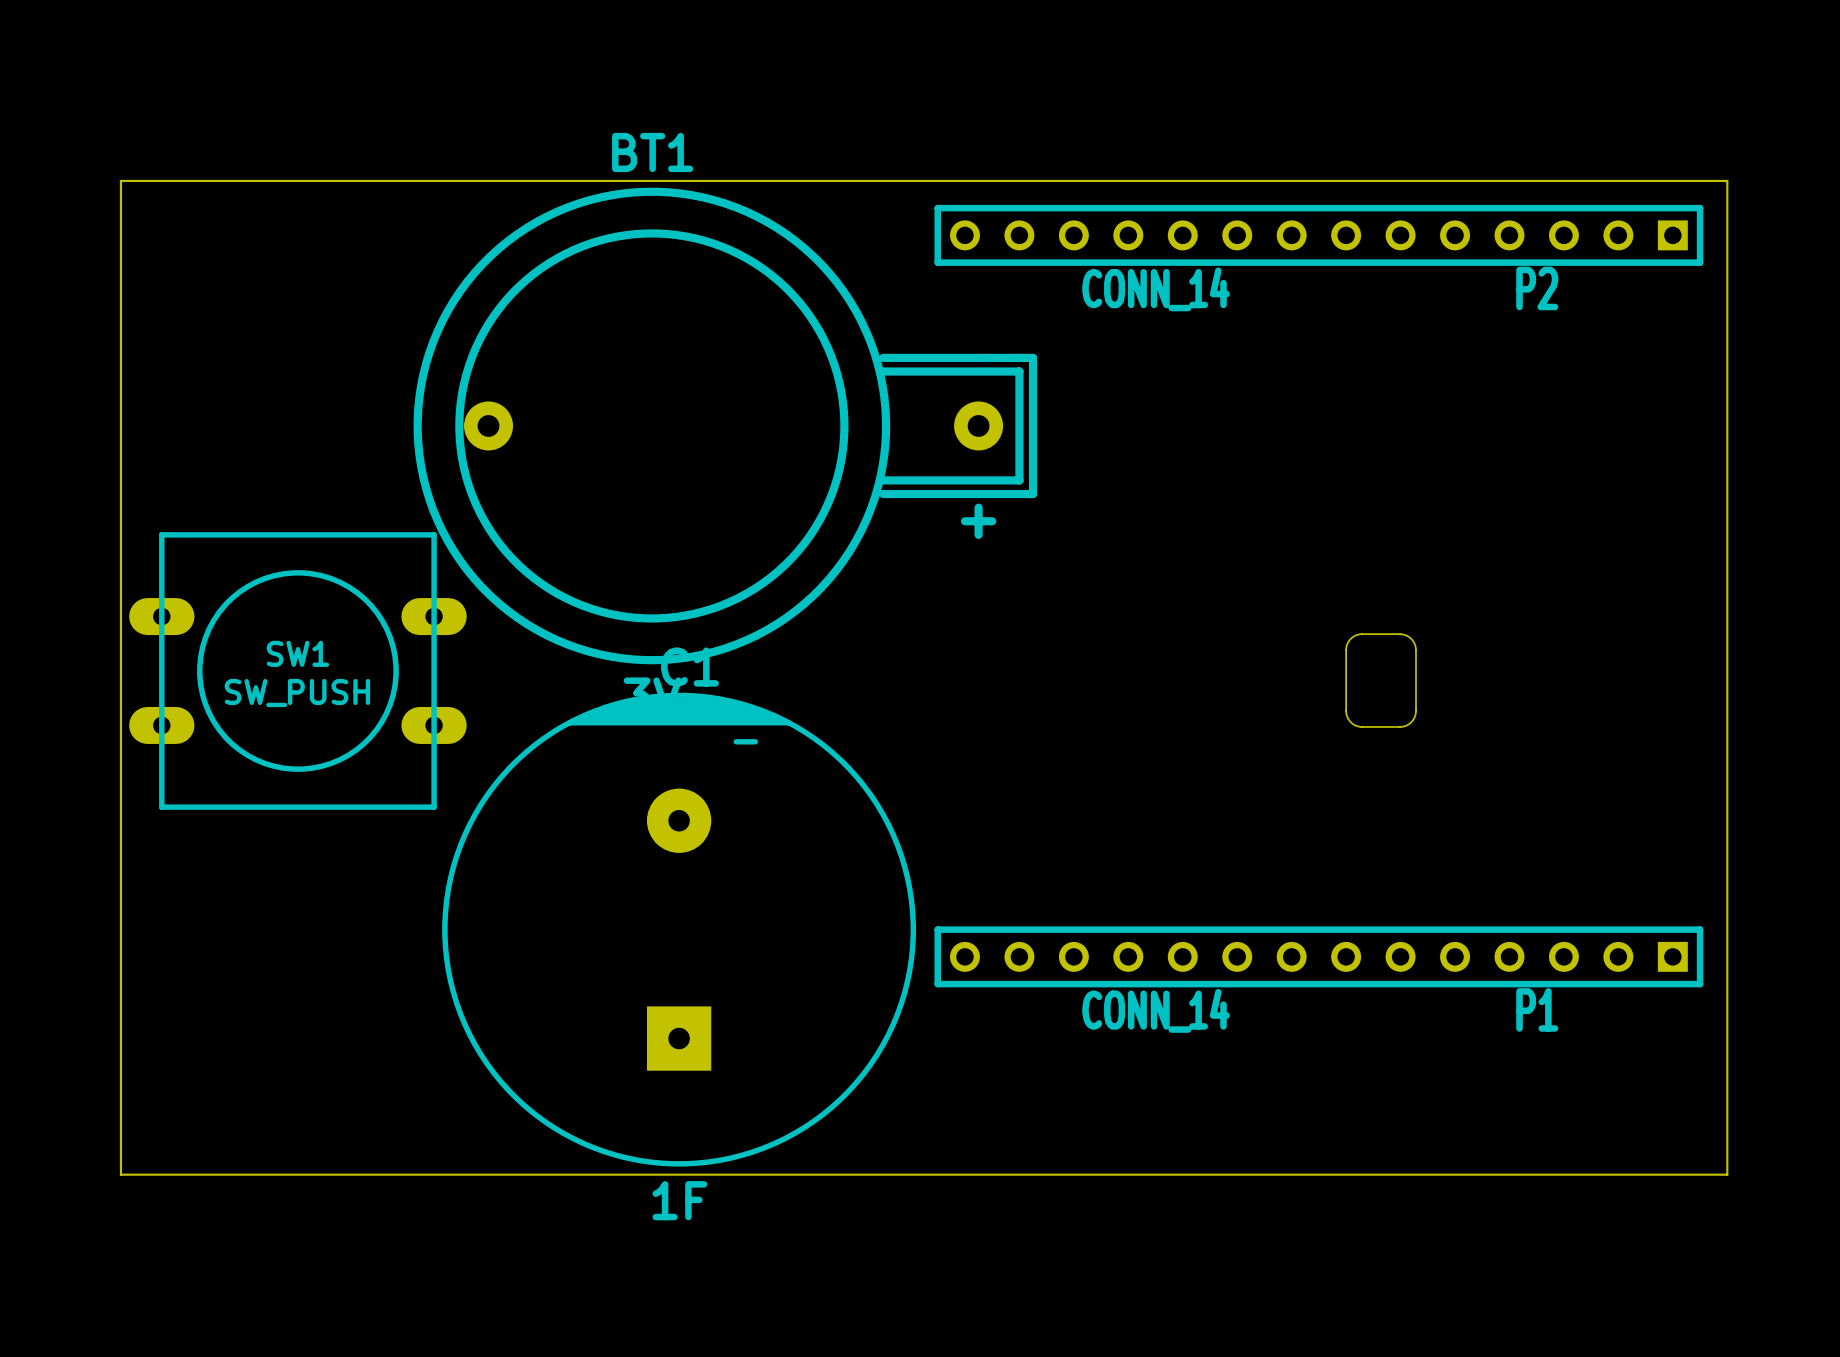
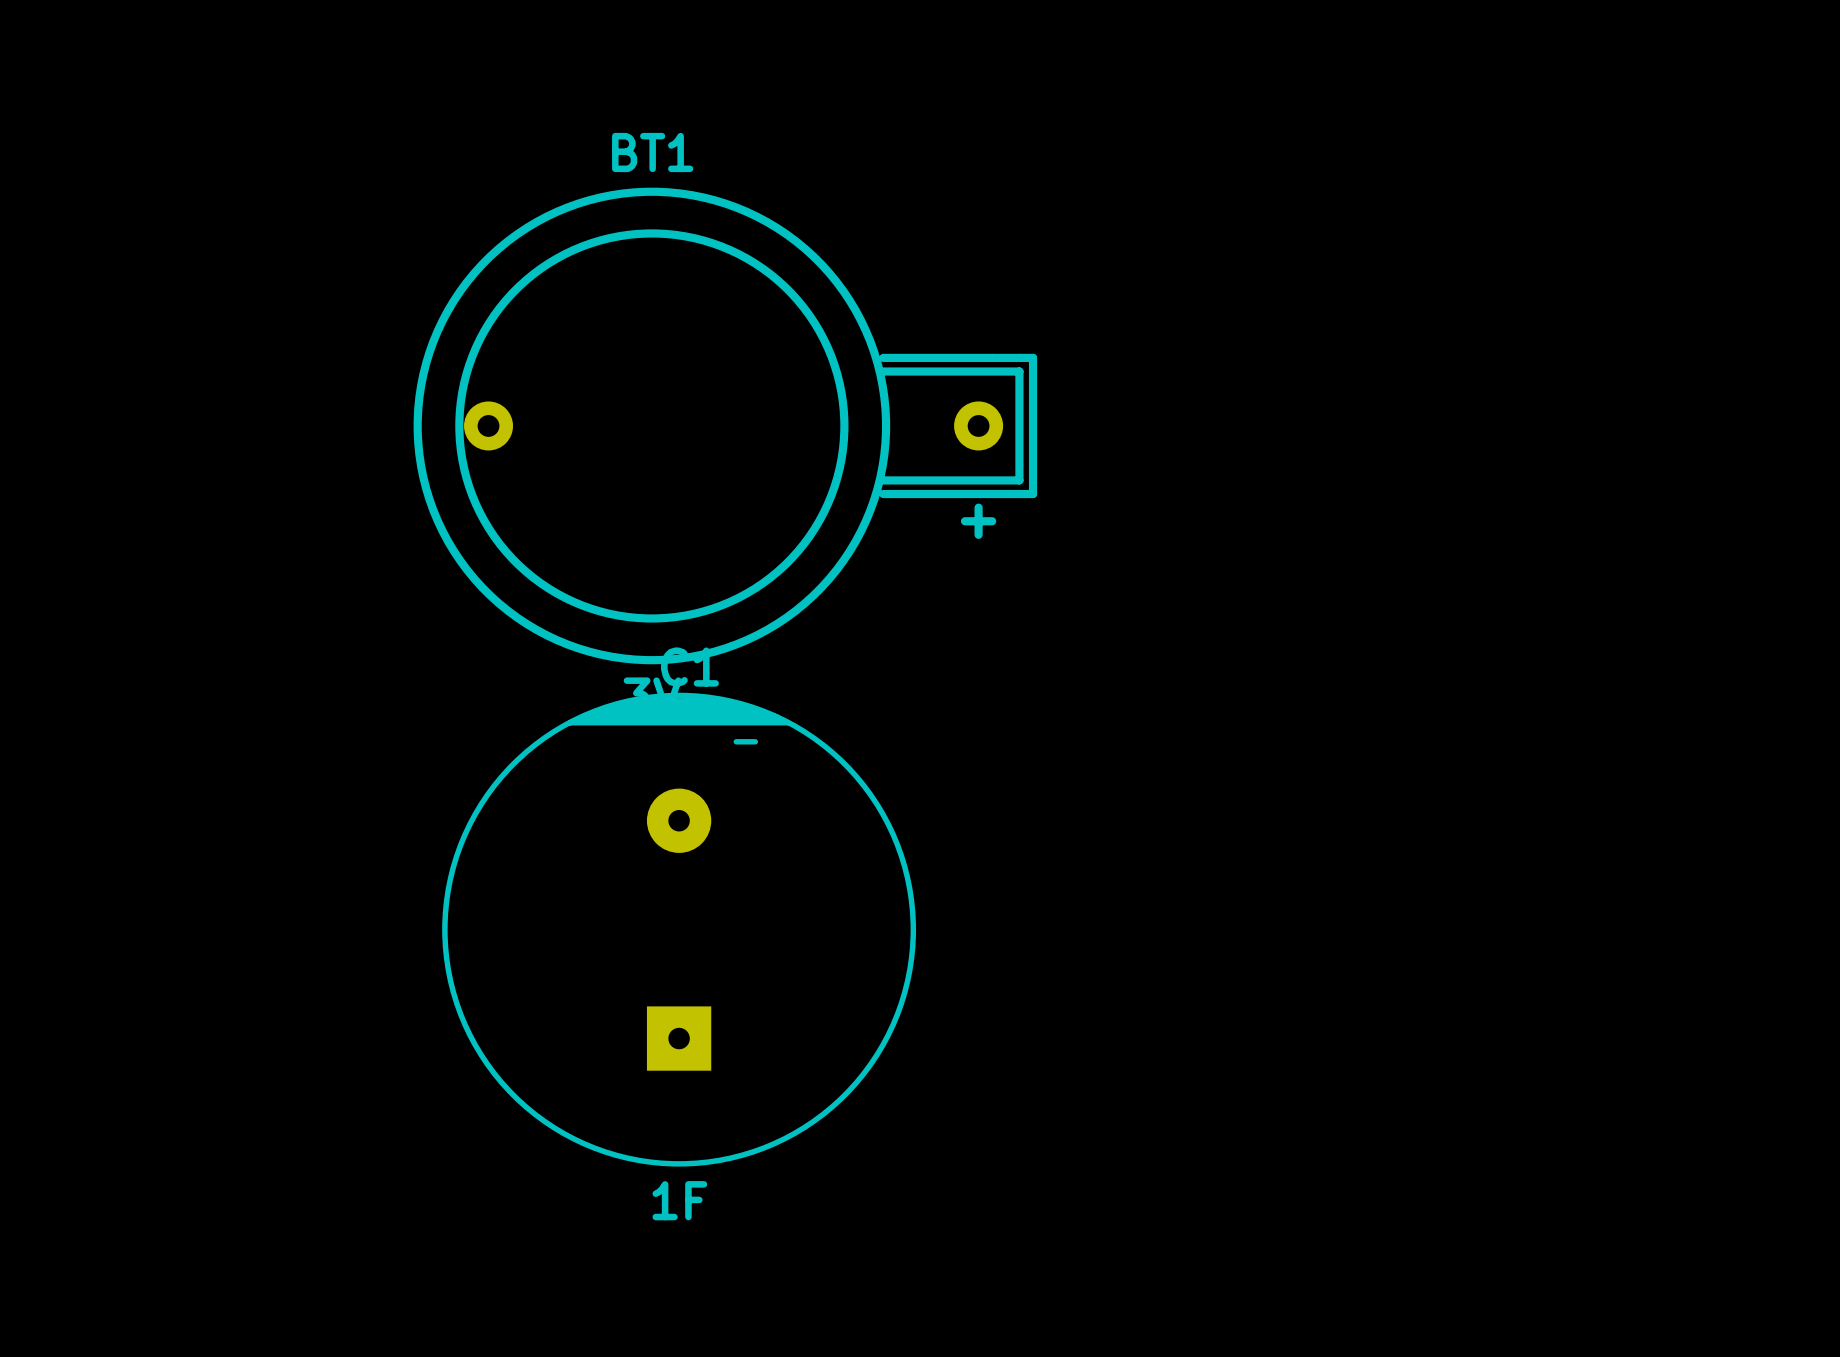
board edge: (120, 180) (1727, 180) (1727, 1174) (120, 1174) (120, 180) -> none
P2: CONN_14 (1318, 235) -> none
SW1: SW_PUSH (297, 671) -> none
part: (1381, 680) -> none
P1: CONN_14 (1318, 956) -> none

